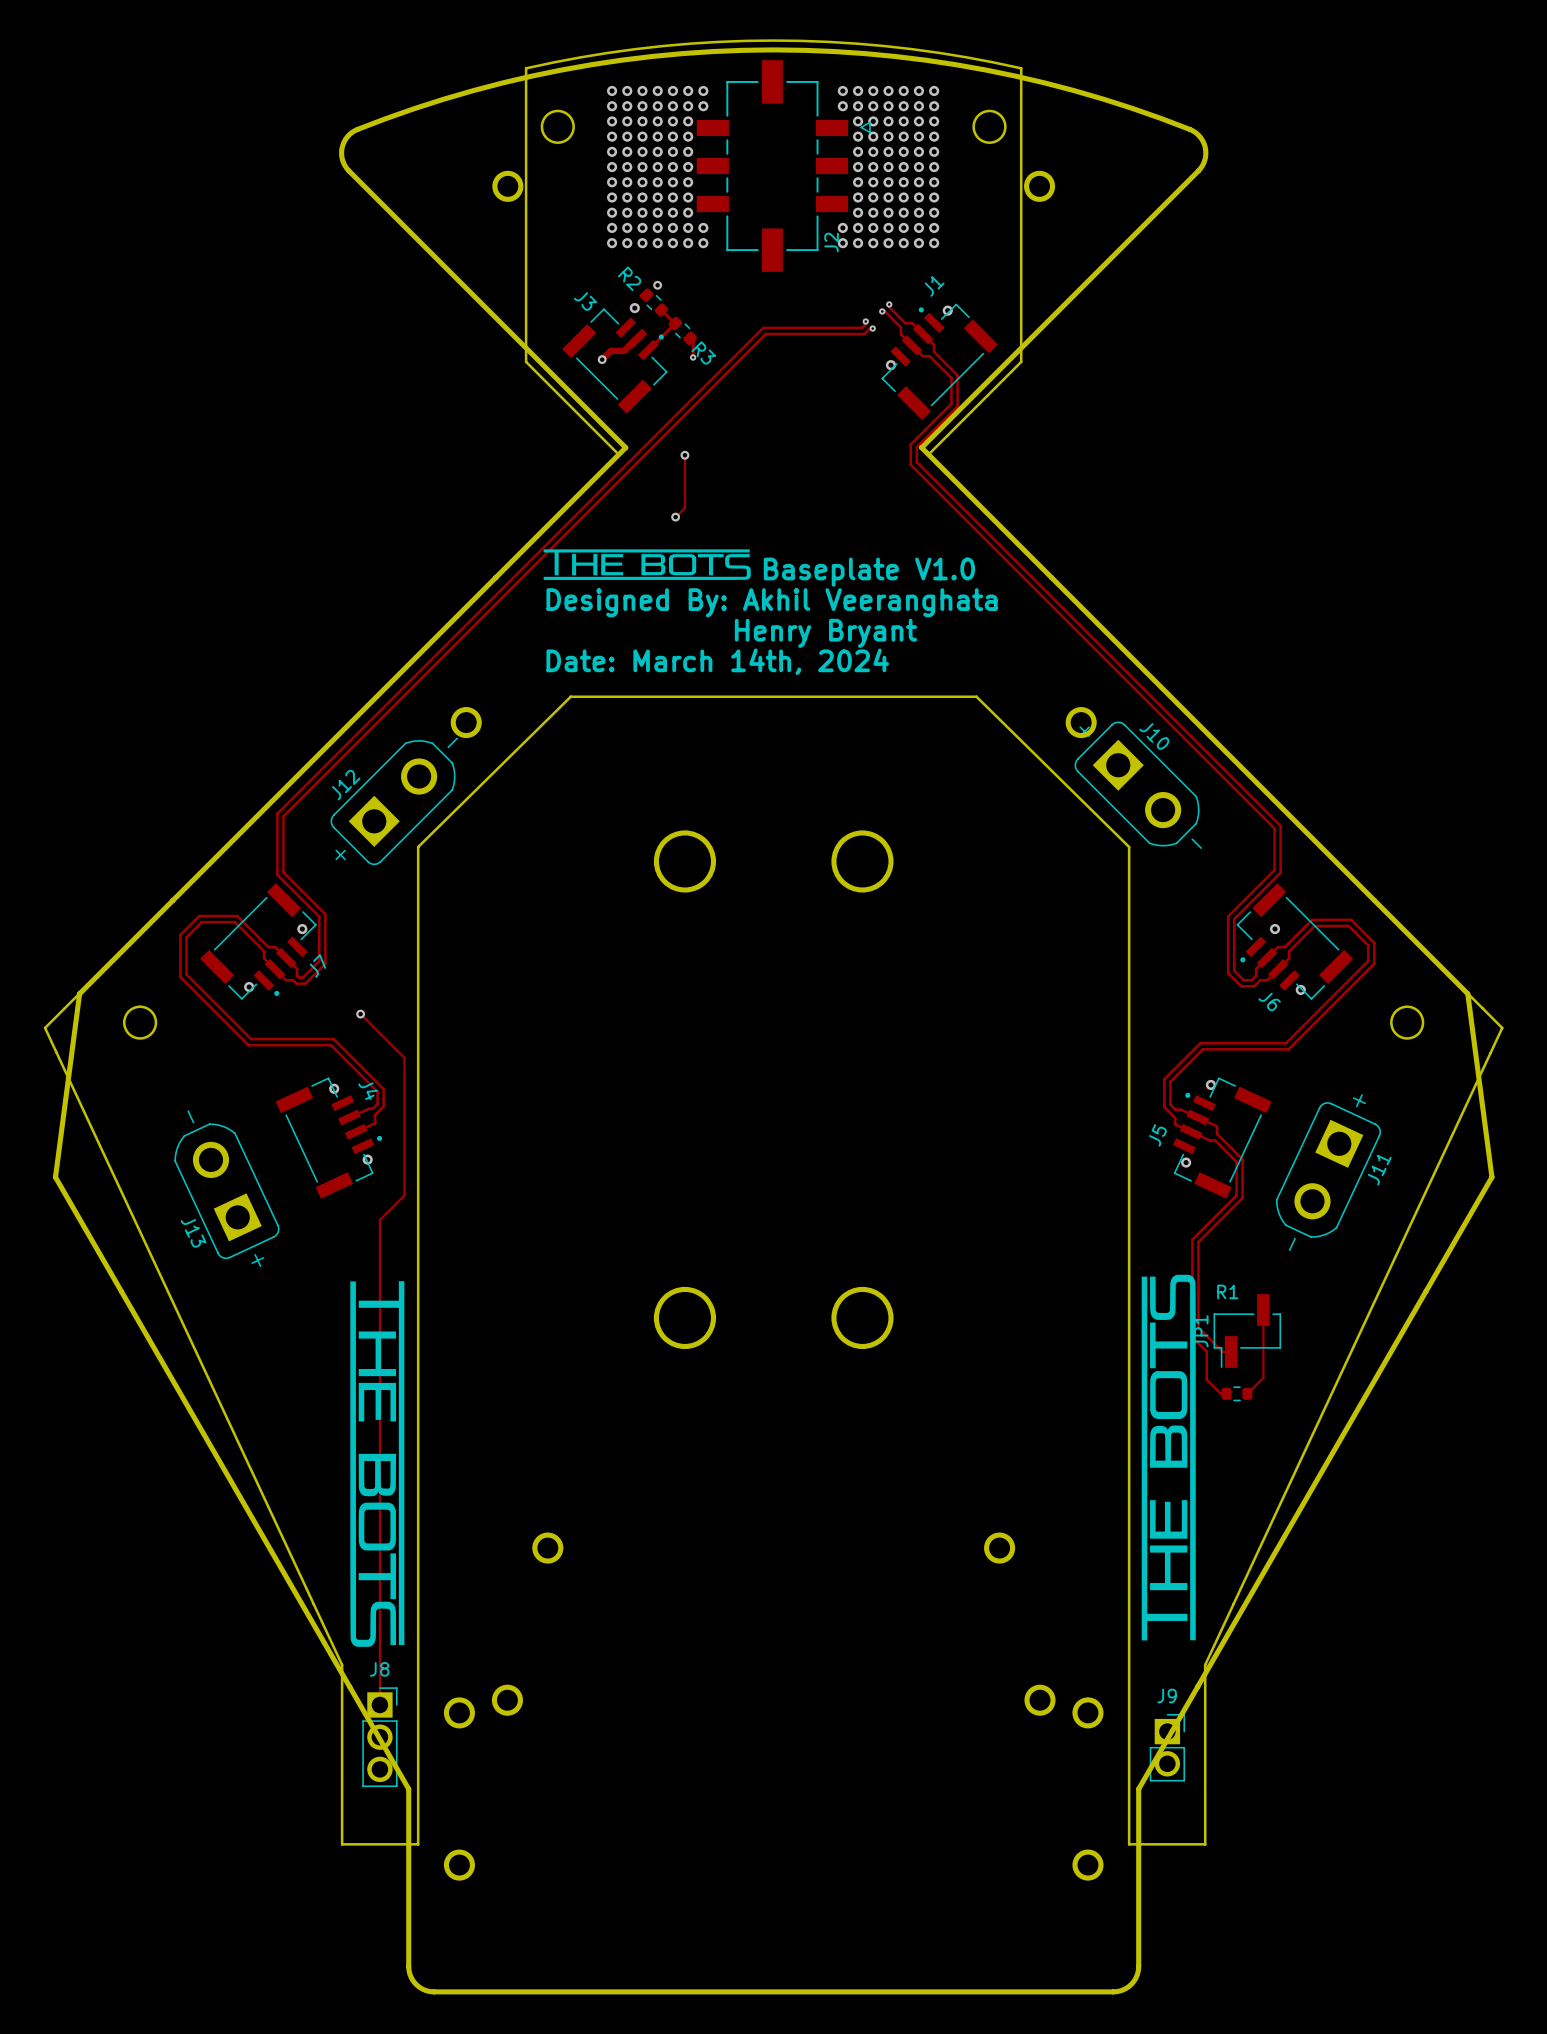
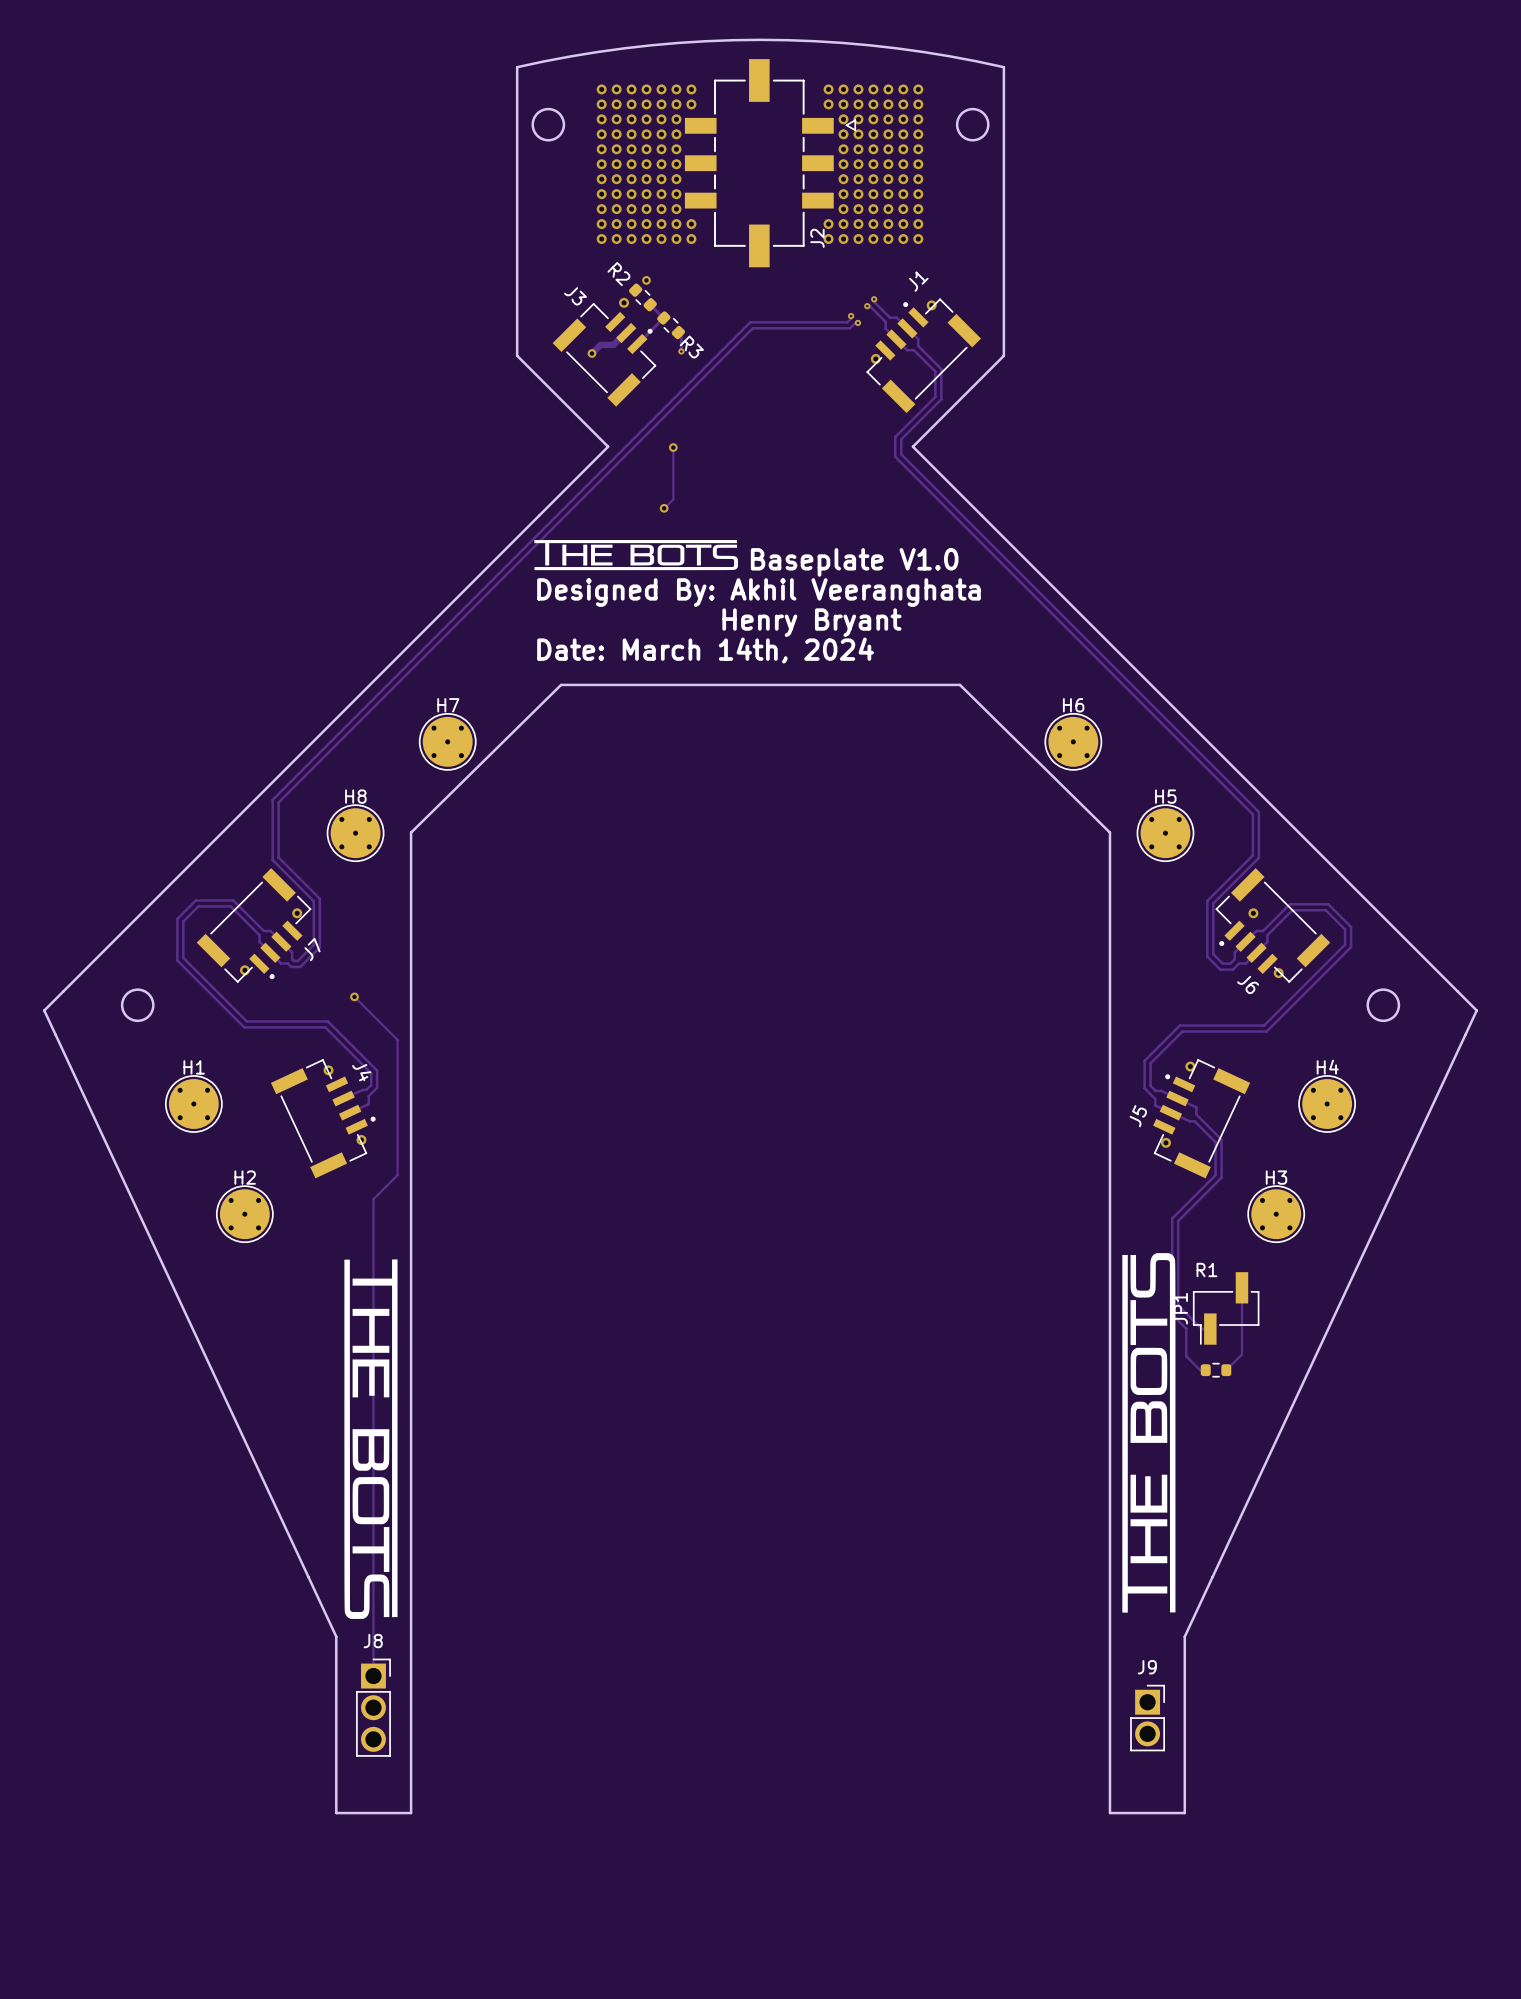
board edge: (357, 129) (349, 134) (342, 144) (341, 157) (346, 168) (625, 447) (79, 993) (55, 1177) (408, 1789) (408, 1966) (411, 1977) (418, 1986) (434, 1991) (1113, 1991) (1123, 1989) (1133, 1981) (1138, 1969) (1138, 1789) (1491, 1177) (1467, 993) (921, 447) (1198, 170) (1205, 157) (1203, 141) (1192, 130) (1132, 108) (1074, 90) (1015, 76) (955, 64) (895, 56) (804, 50) (743, 50) (682, 53) (621, 60) (561, 69) (472, 90) (414, 108) (357, 129) -> none
round board edge: [492, 170, 524, 202] -> none
round board edge: [1024, 170, 1056, 202] -> none
round board edge: [450, 707, 482, 739] -> none
round board edge: [1065, 707, 1097, 739] -> none
H7: none -> (447, 741)
H6: none -> (1073, 741)
J10: (1138, 785) -> none
J12: (394, 801) -> none
round board edge: [653, 830, 717, 893] -> none
round board edge: [831, 830, 894, 893] -> none
H8: none -> (355, 833)
H5: none -> (1165, 833)
H1: none -> (193, 1103)
H4: none -> (1327, 1103)
J11: (1328, 1172) -> none
J13: (226, 1188) -> none
H2: none -> (244, 1214)
H3: none -> (1276, 1214)
round board edge: [653, 1286, 717, 1350] -> none
round board edge: [831, 1286, 894, 1350] -> none
round board edge: [532, 1532, 564, 1564] -> none
round board edge: [984, 1532, 1016, 1564] -> none
round board edge: [491, 1684, 523, 1716] -> none
round board edge: [1024, 1684, 1056, 1716] -> none
round board edge: [443, 1697, 475, 1729] -> none
round board edge: [1072, 1697, 1104, 1729] -> none
round board edge: [443, 1849, 475, 1881] -> none
round board edge: [1072, 1849, 1104, 1881] -> none

